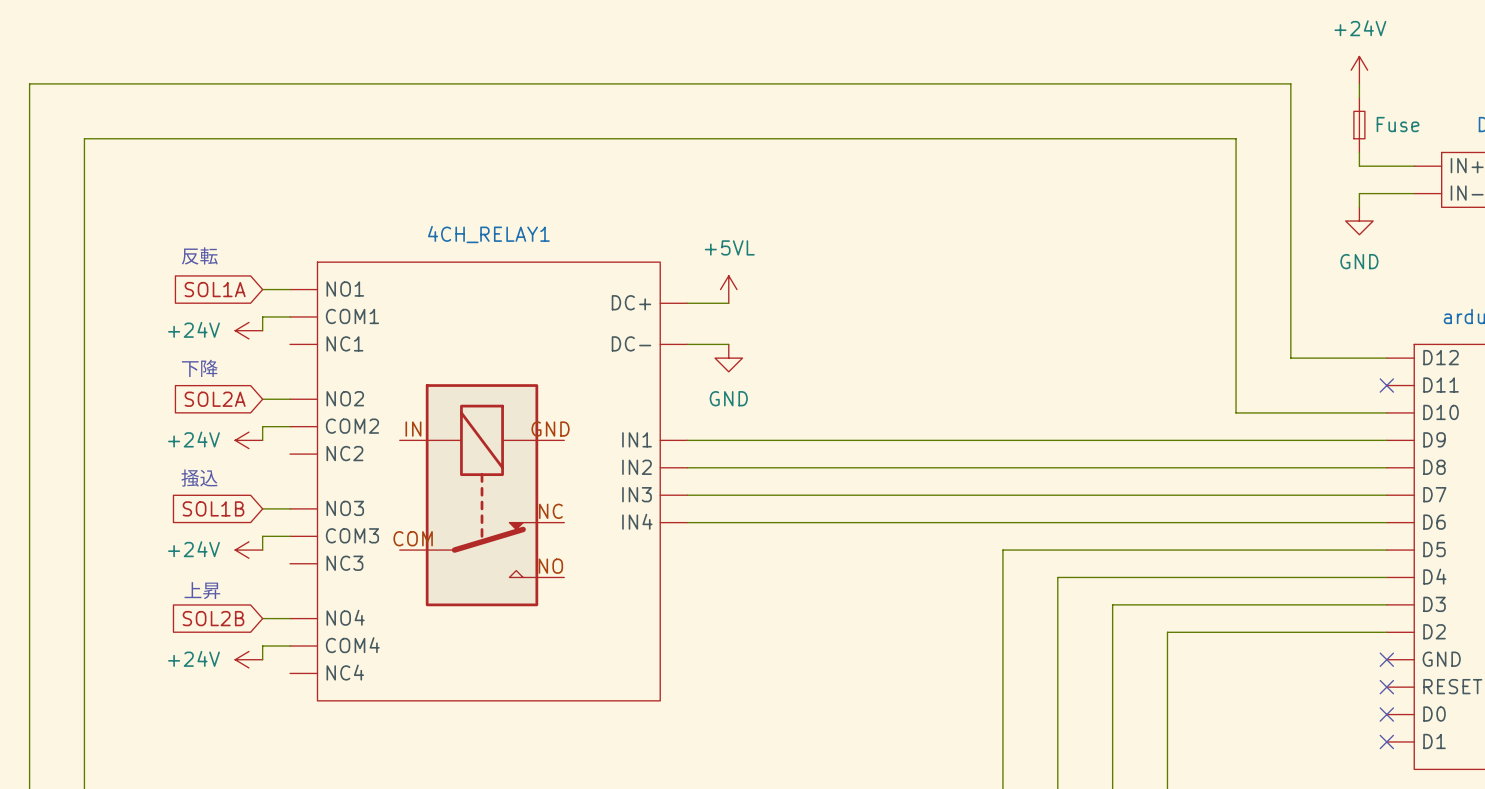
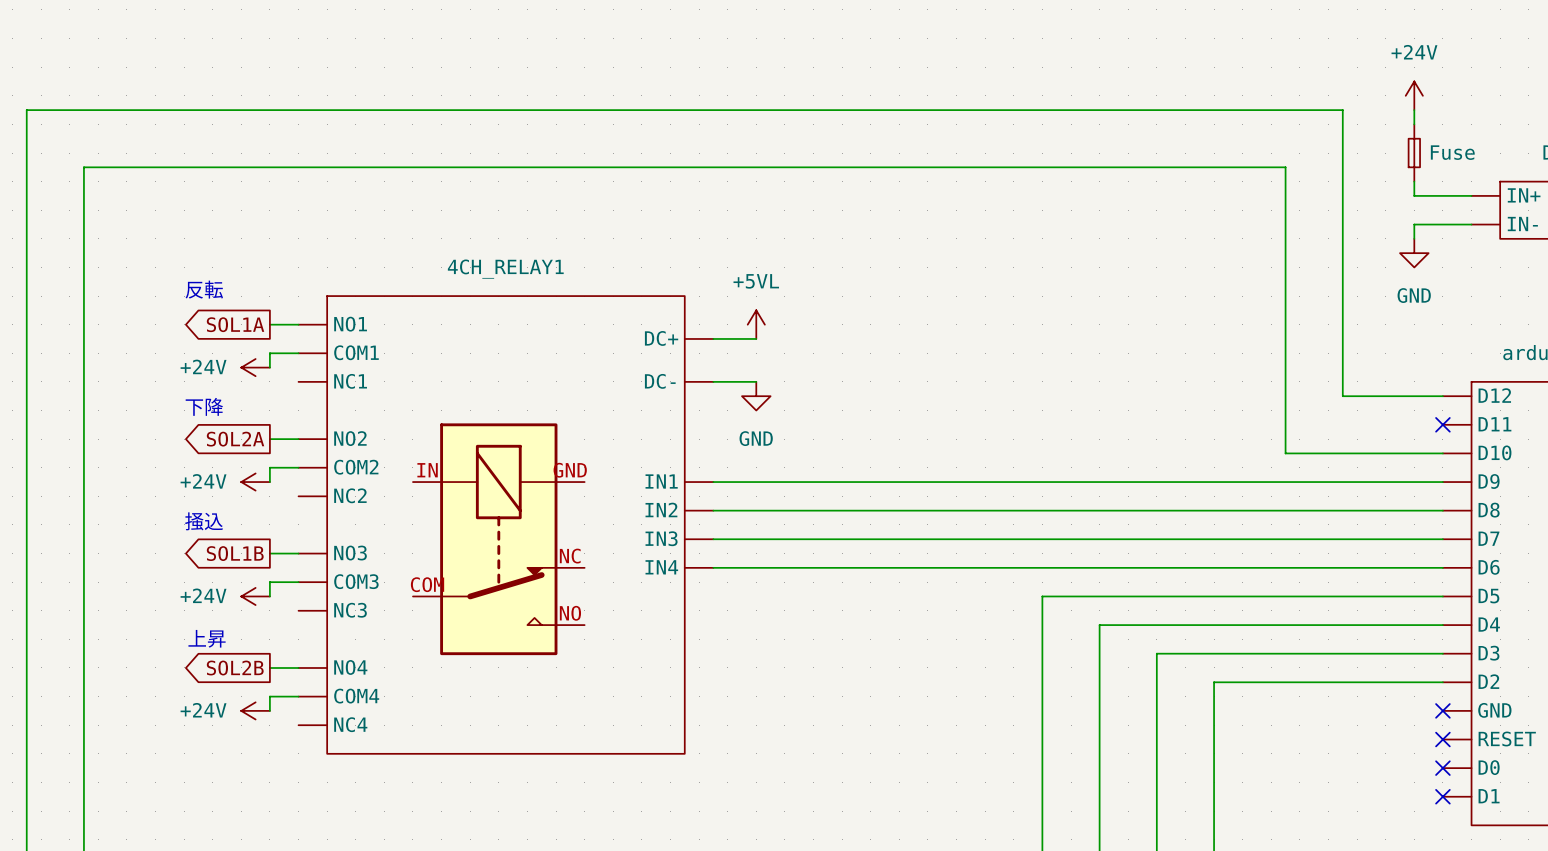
global label shape: input (215, 289) -> output (235, 324)
global label shape: input (215, 399) -> output (235, 439)
global label shape: input (213, 508) -> output (235, 553)
global label shape: input (213, 618) -> output (235, 668)

